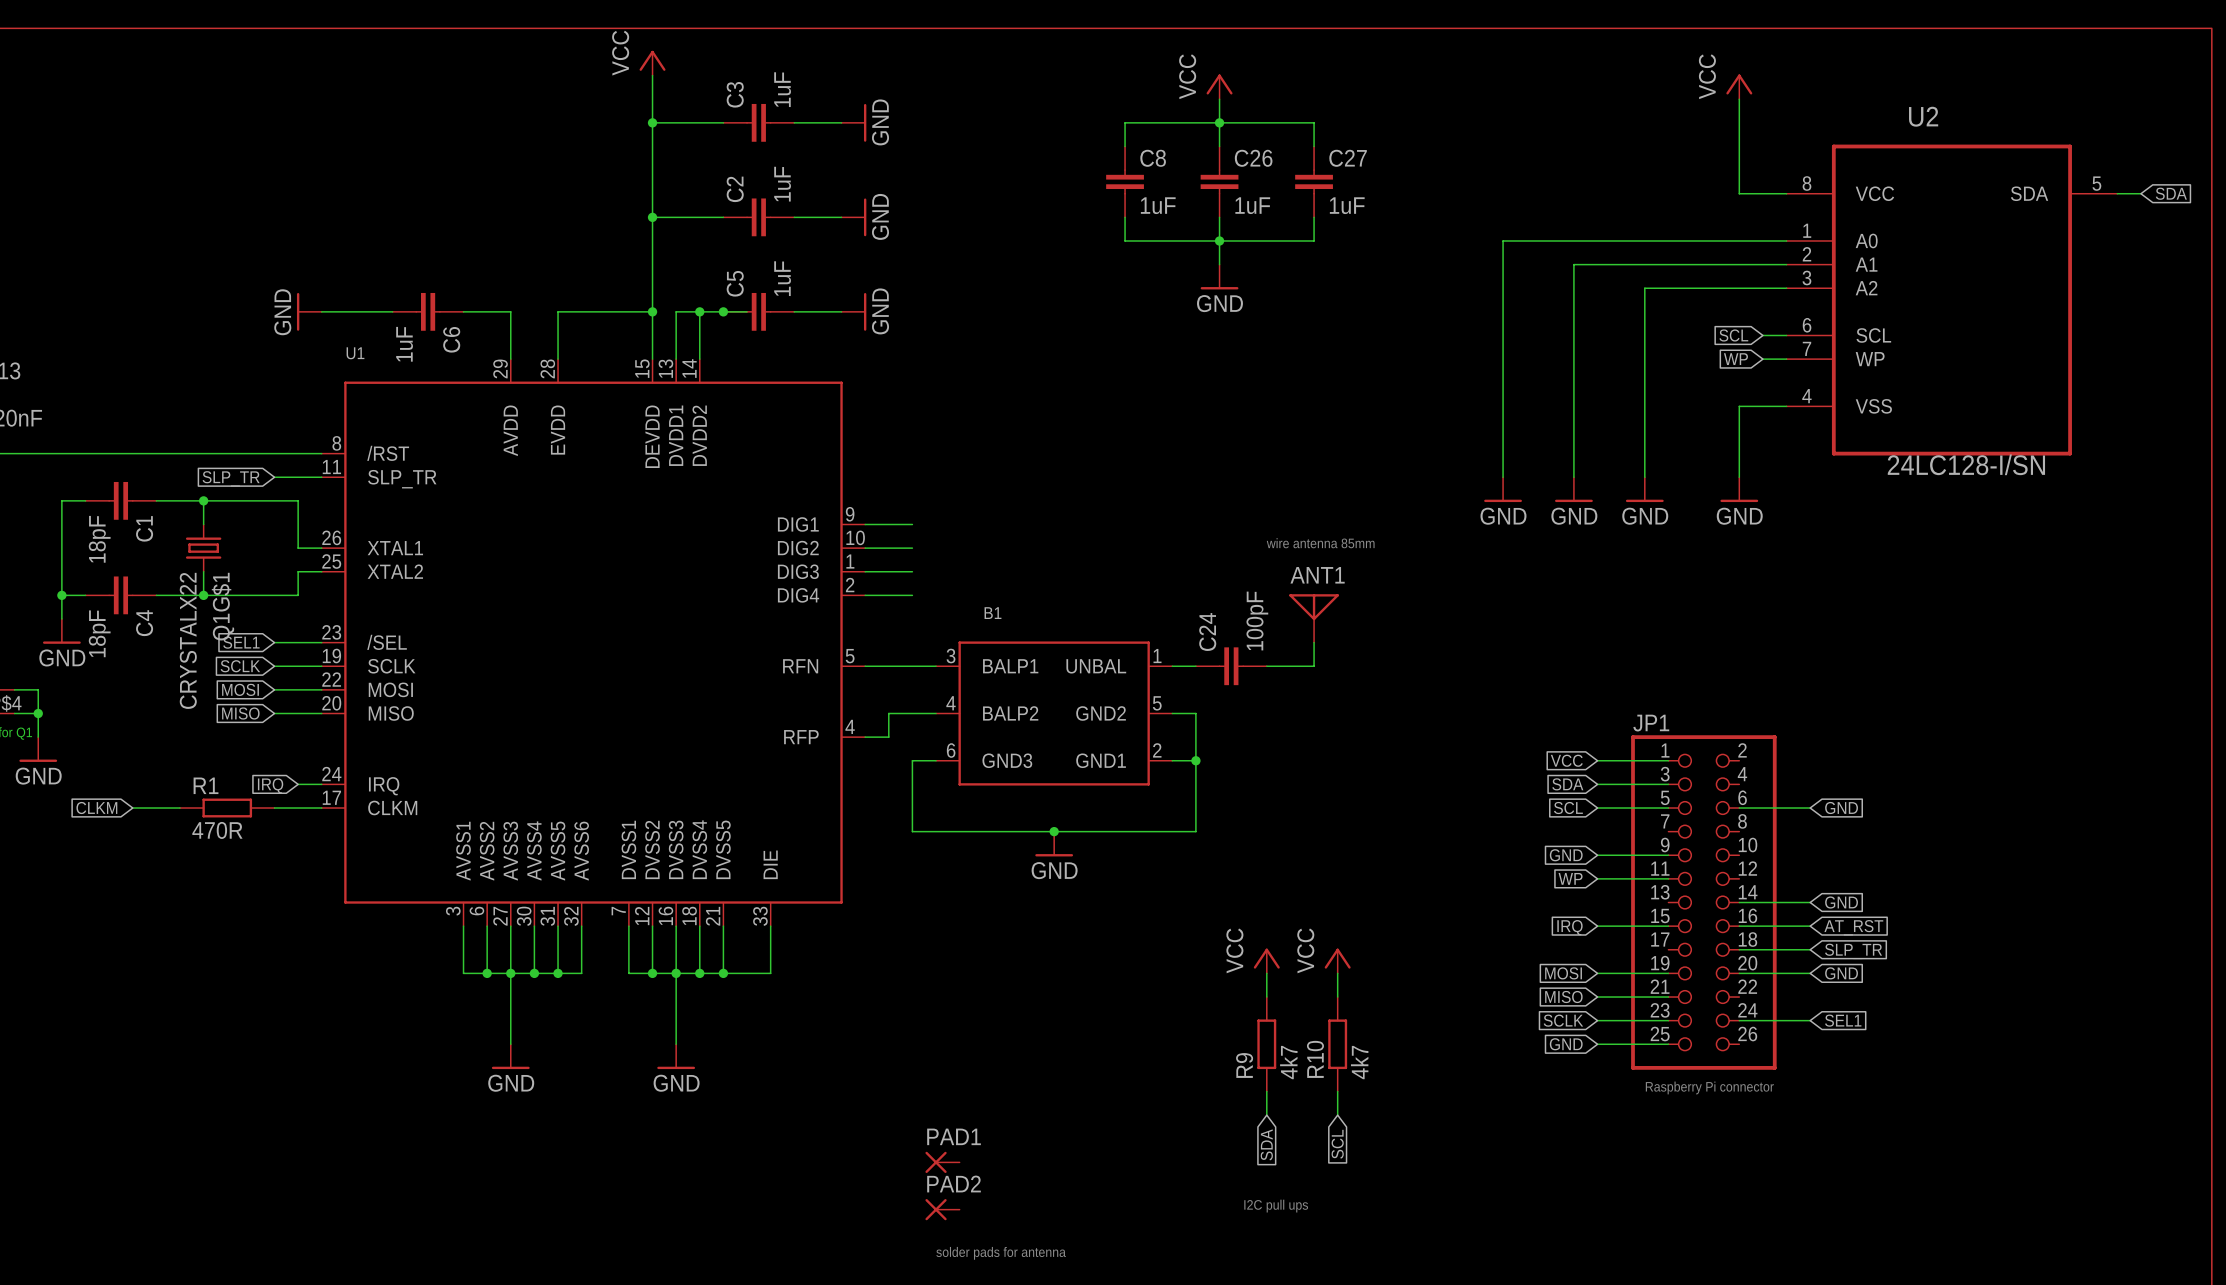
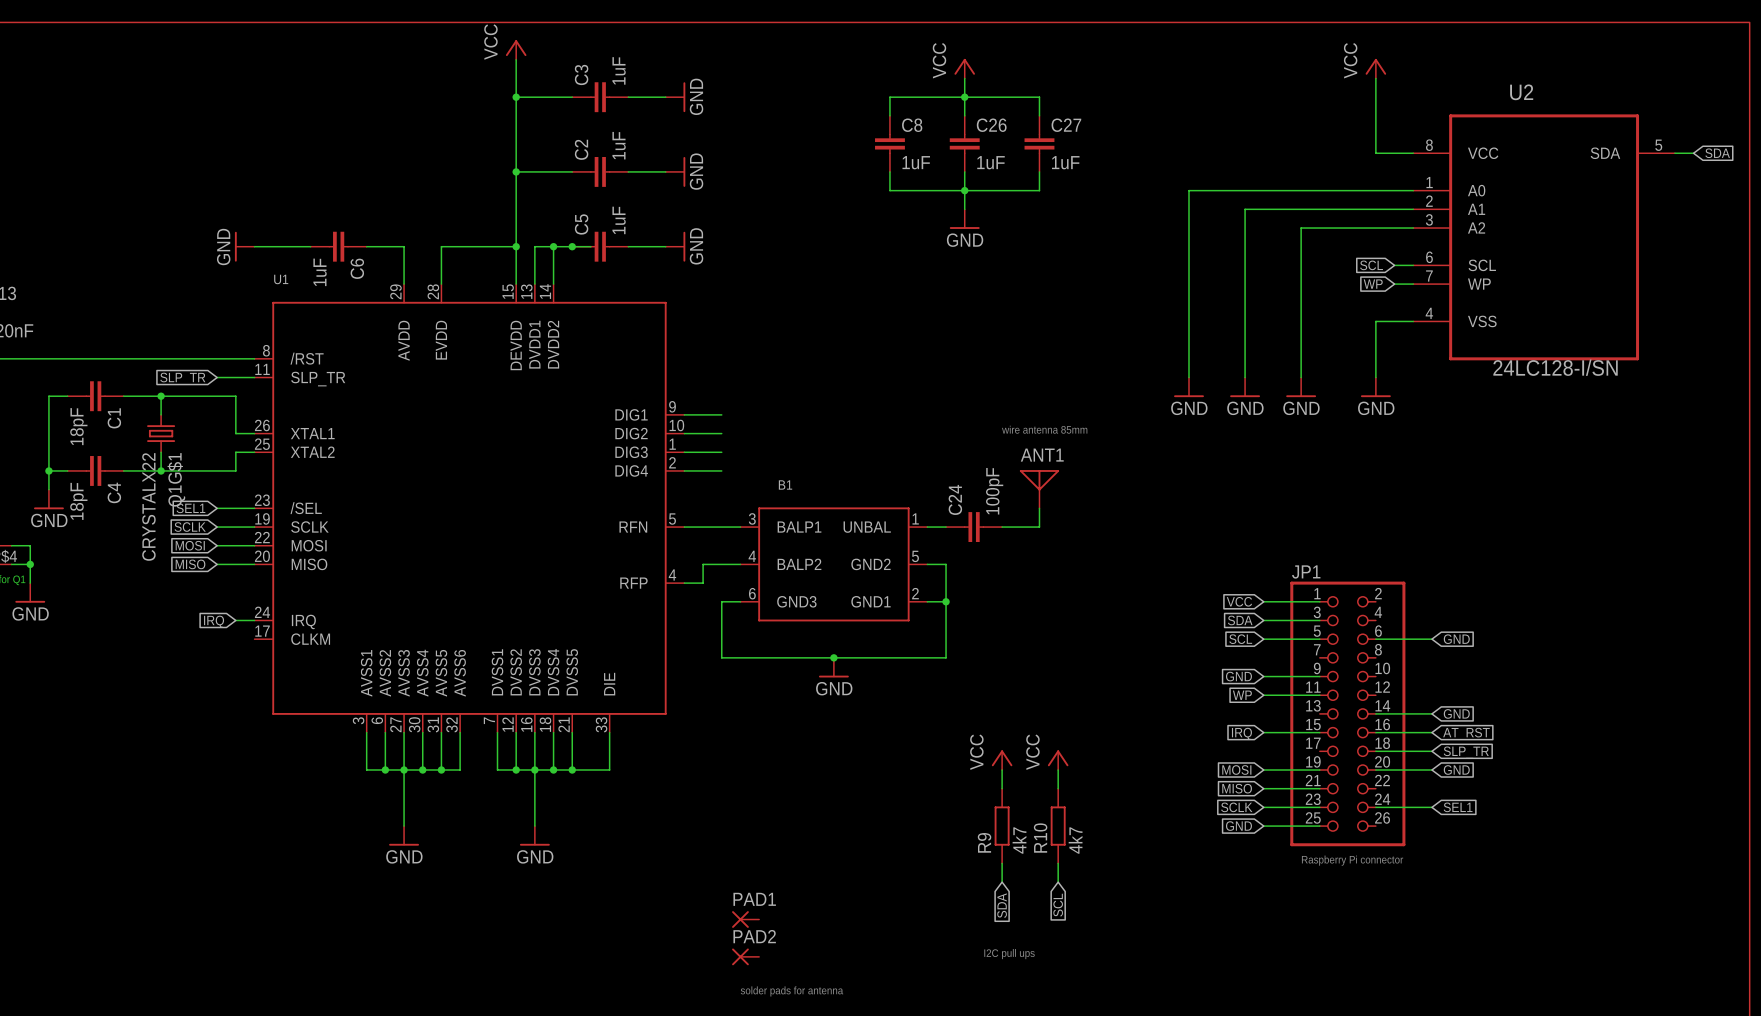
global label: CLKM (96, 808) -> none
wire: (132, 808) (180, 808) -> none
R1: 470R (227, 808) -> none
wire: (274, 808) (321, 808) -> none

